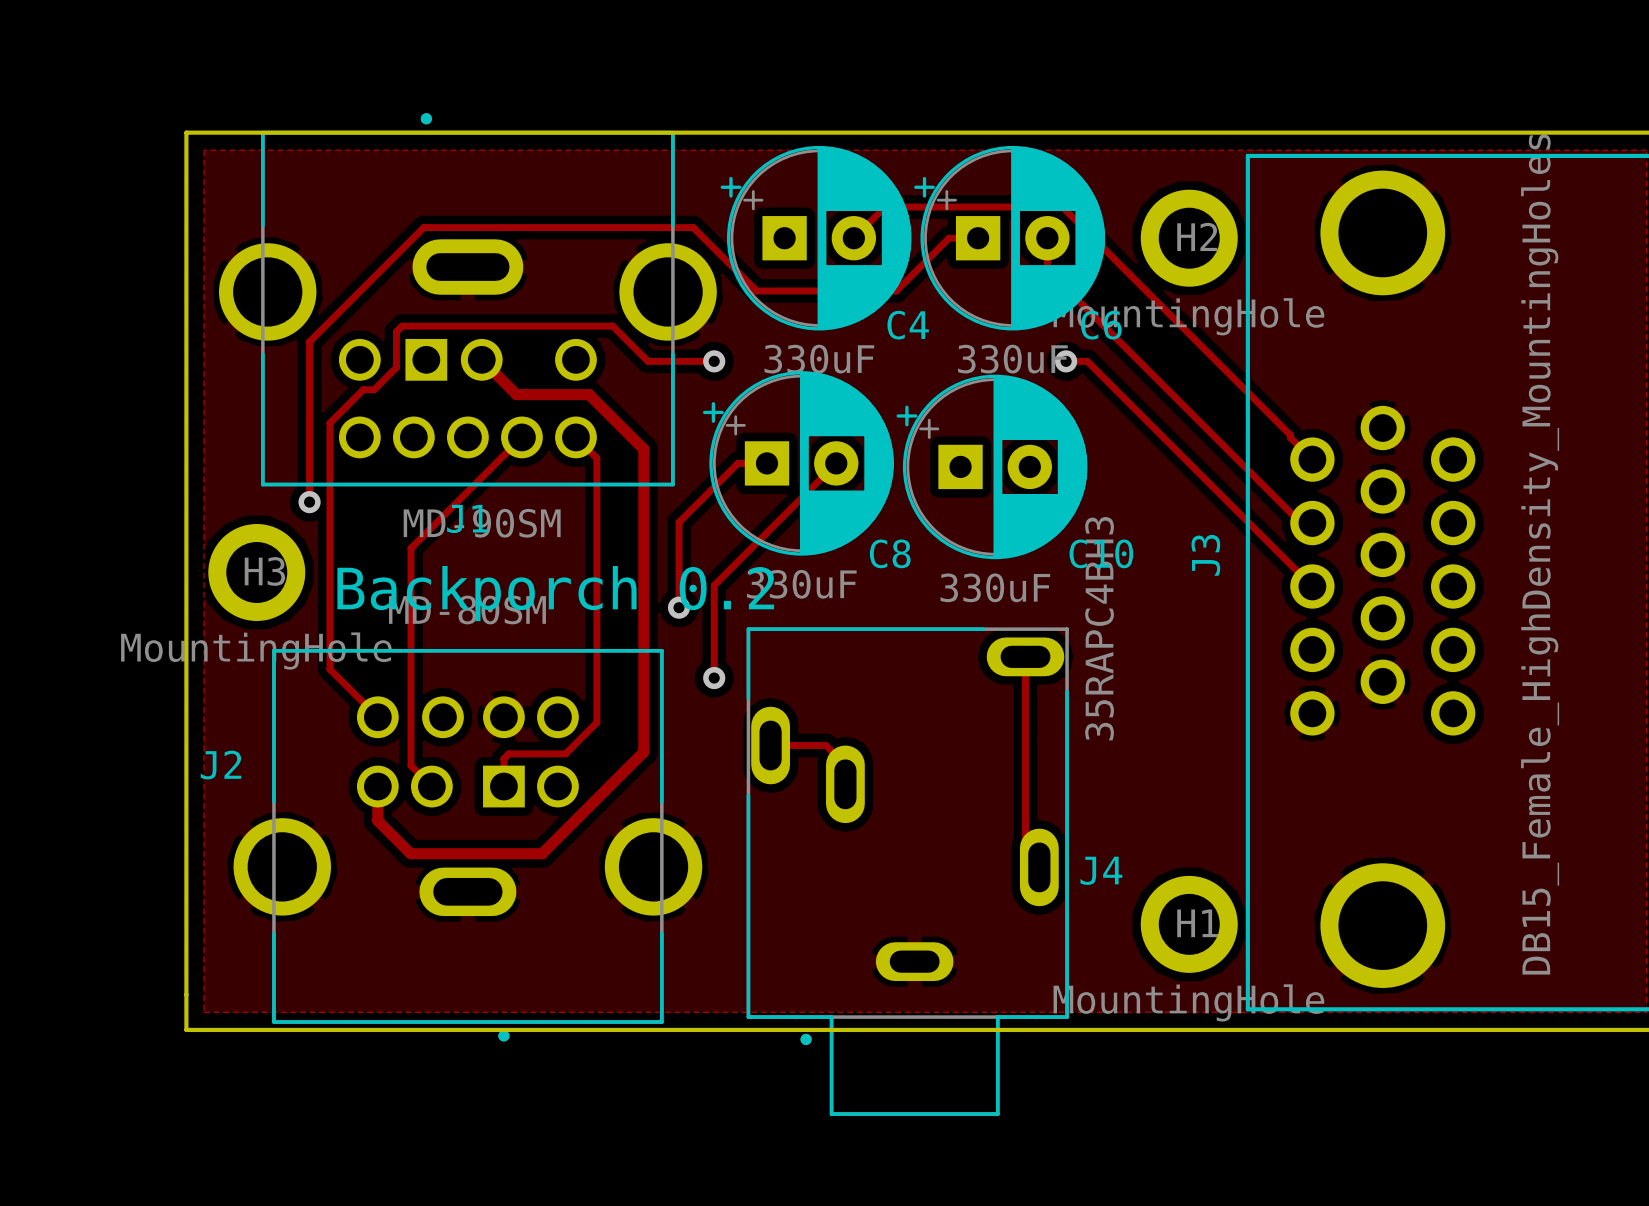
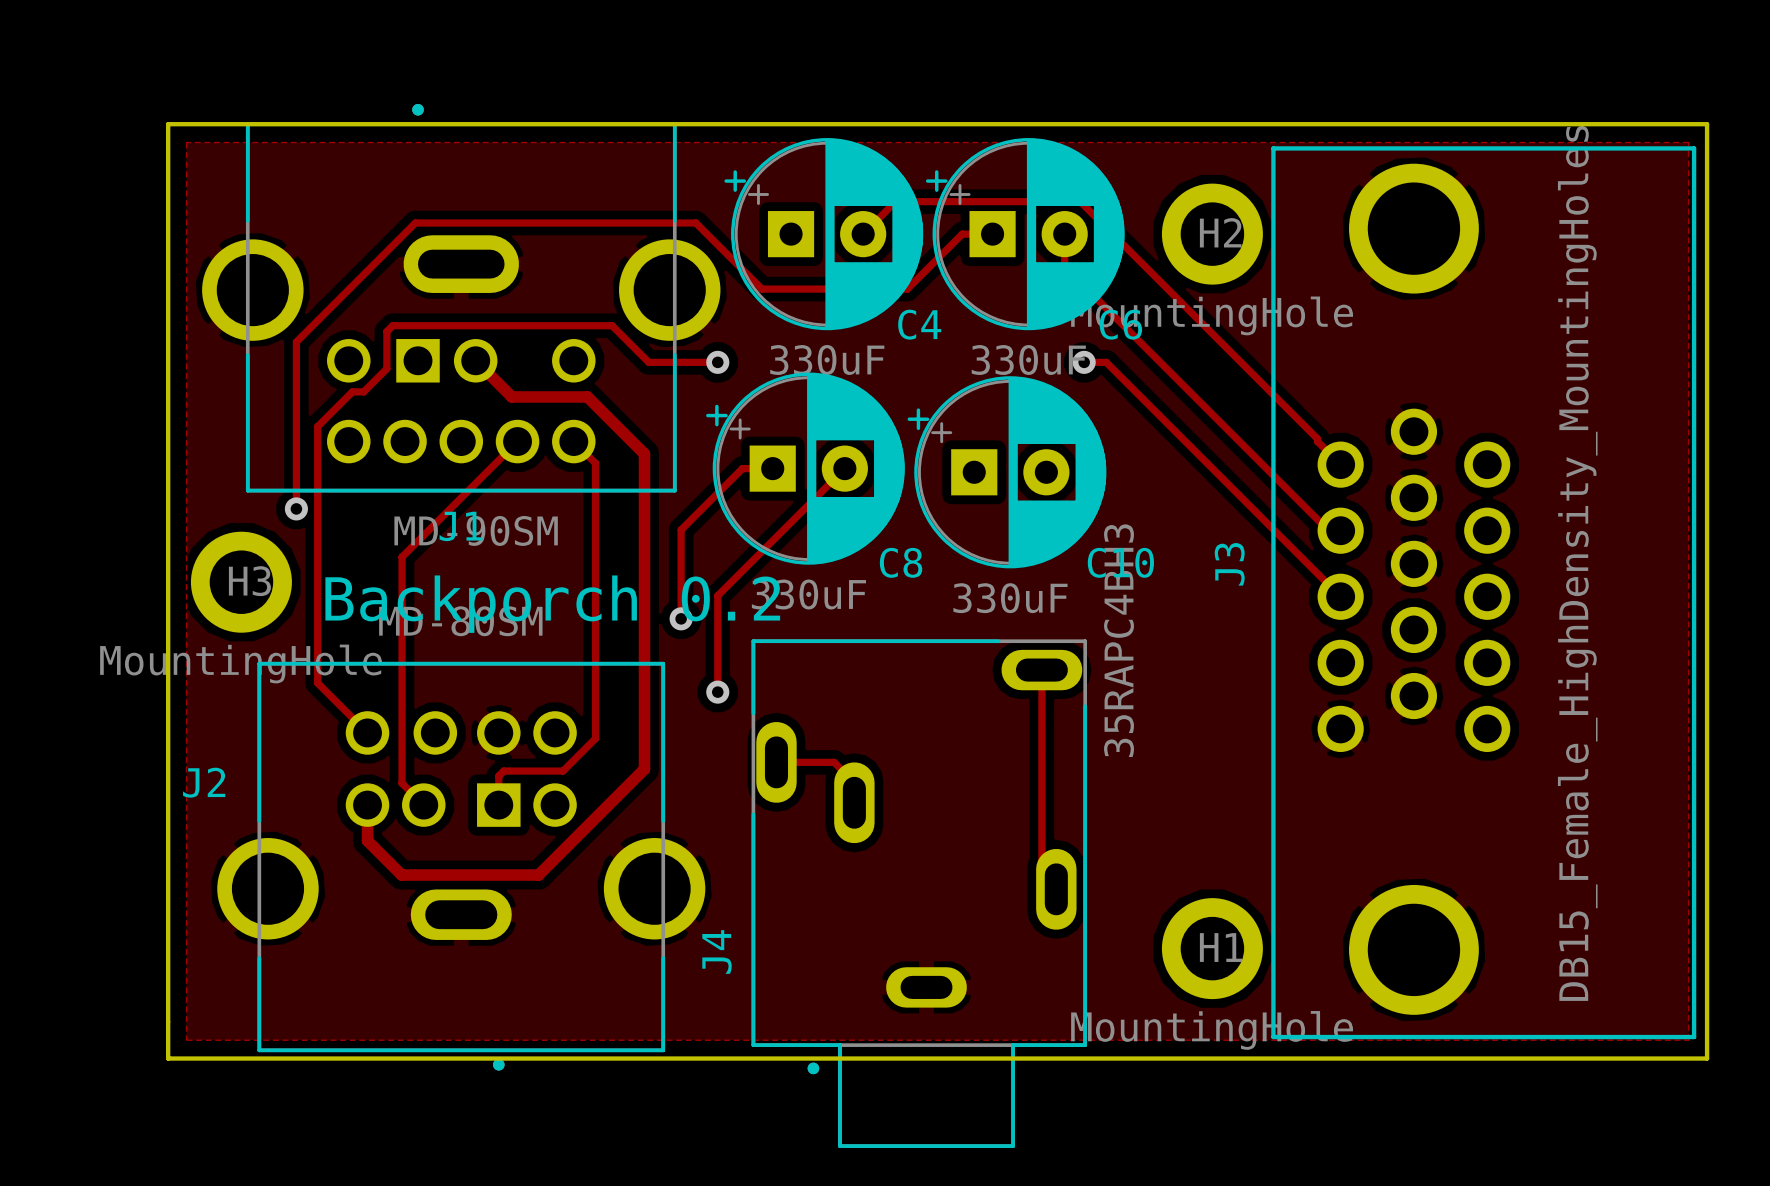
J4 name rotation: 0° (1101, 870) -> 90° counterclockwise (717, 951)
J4 name position: J4 (1101, 870) -> J4 (717, 951)

